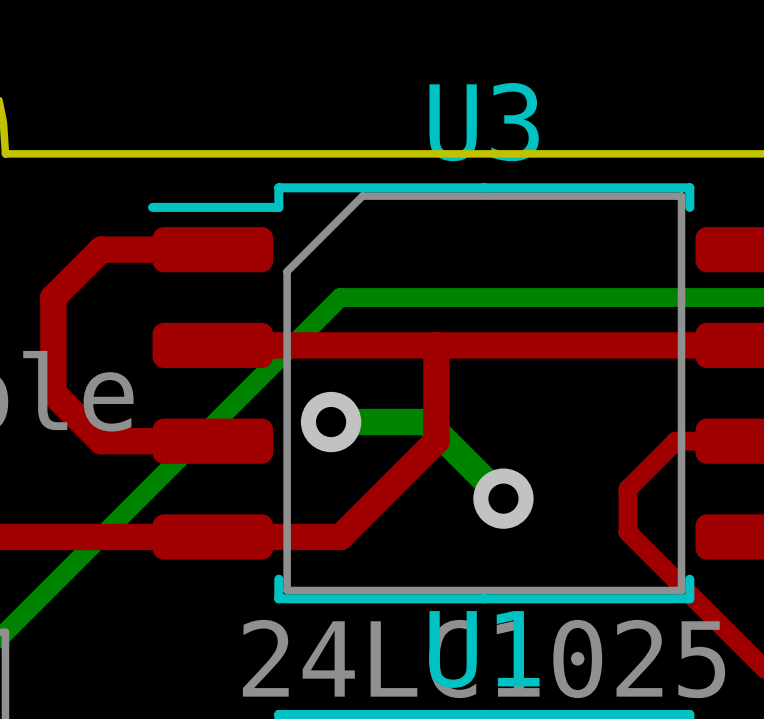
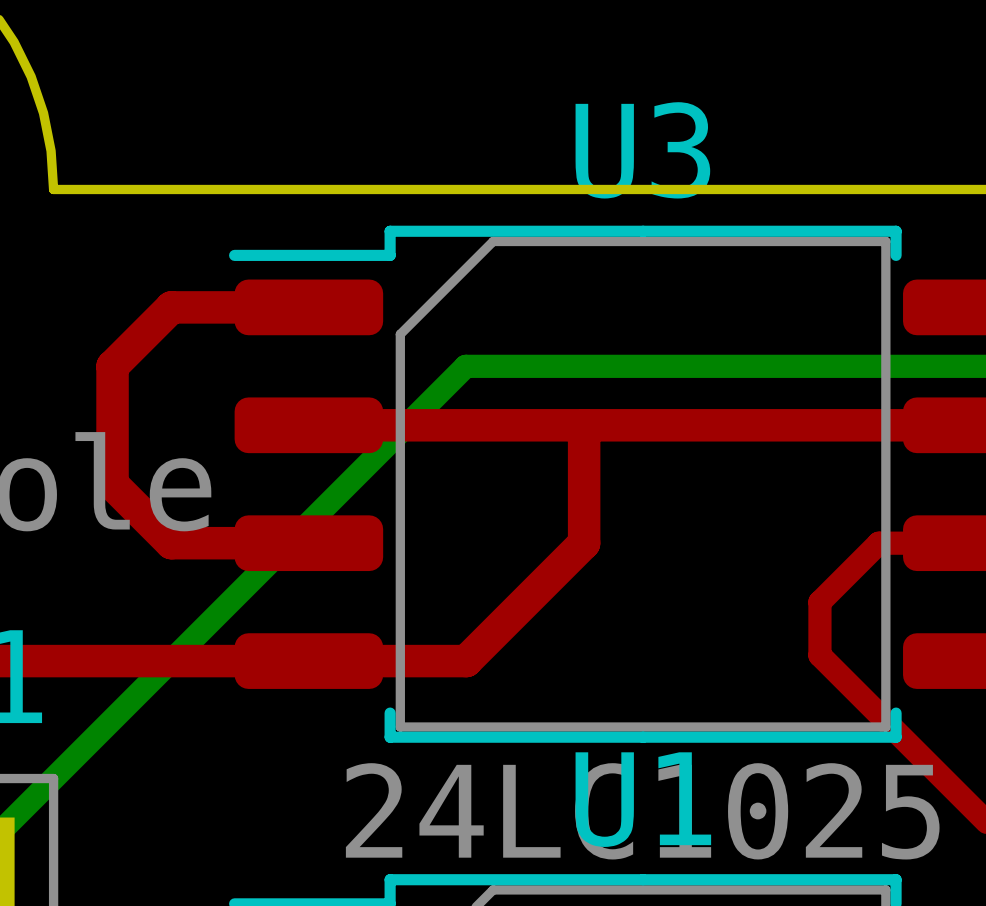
bottom track: (331, 422) (426, 422) (503, 498) -> none
via: (331, 422) -> none
via: (503, 498) -> none

